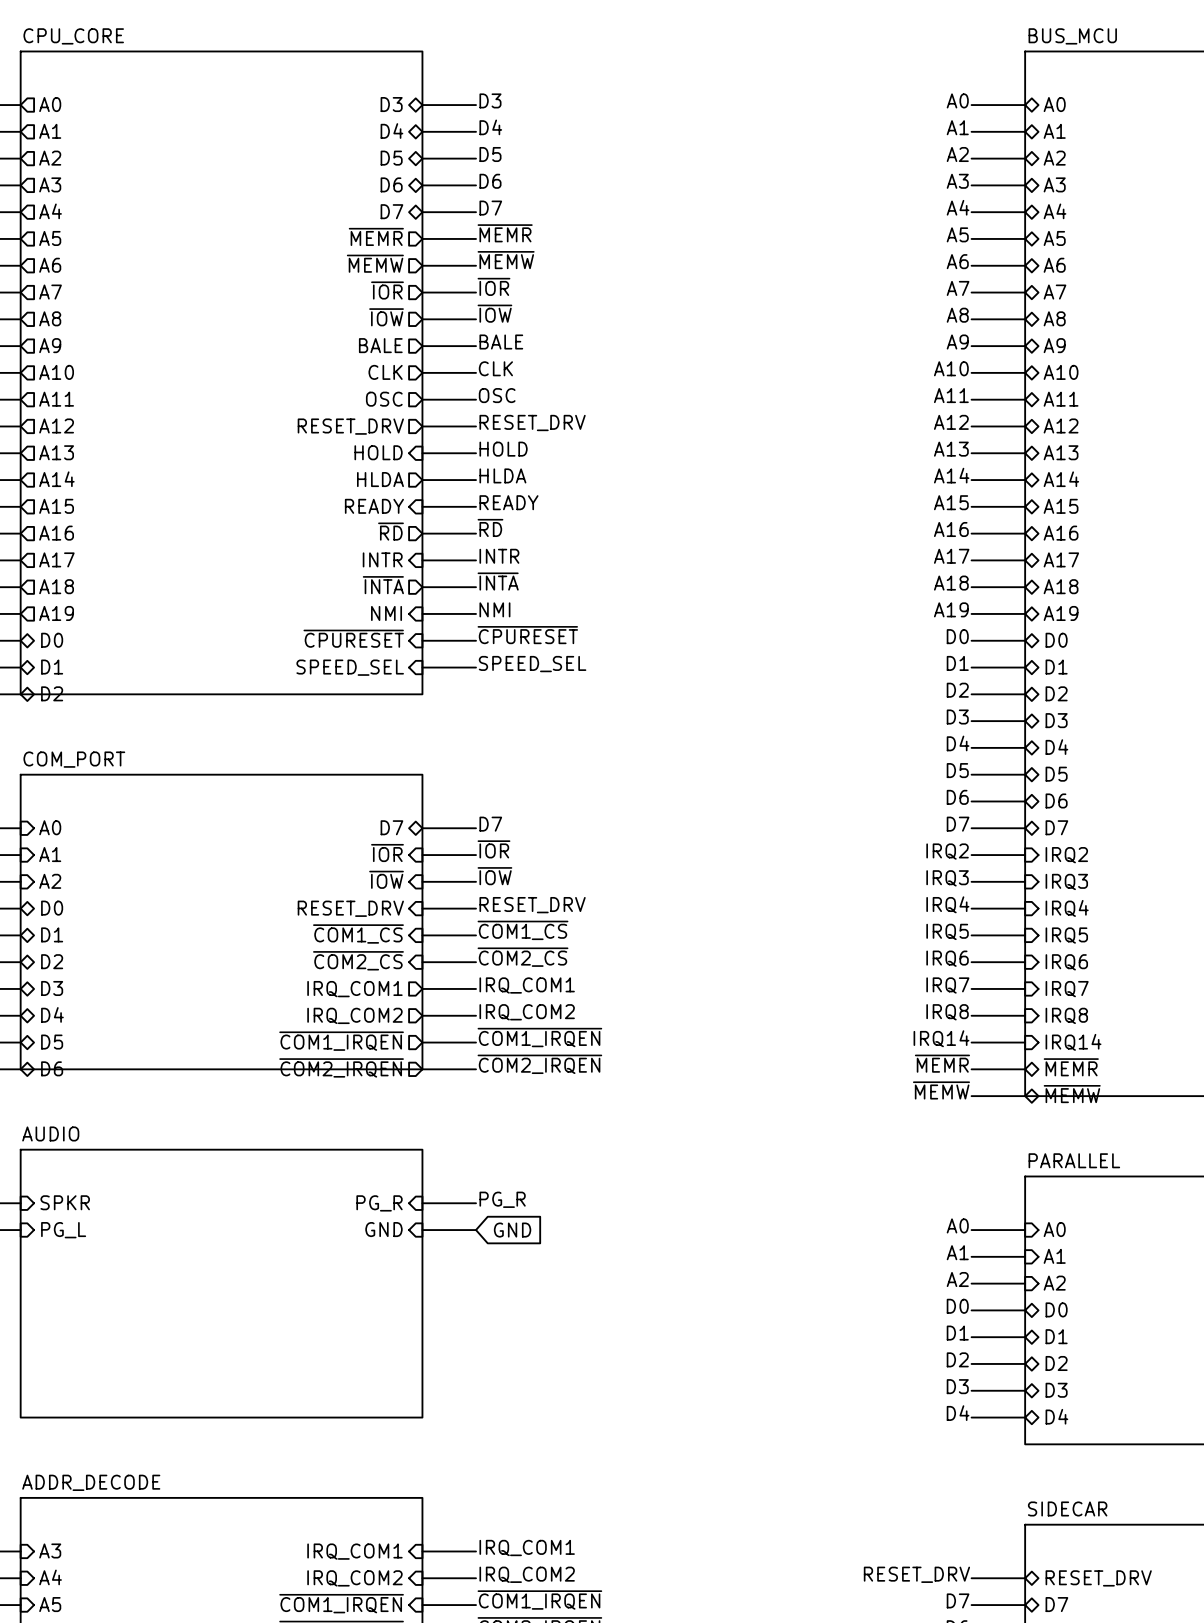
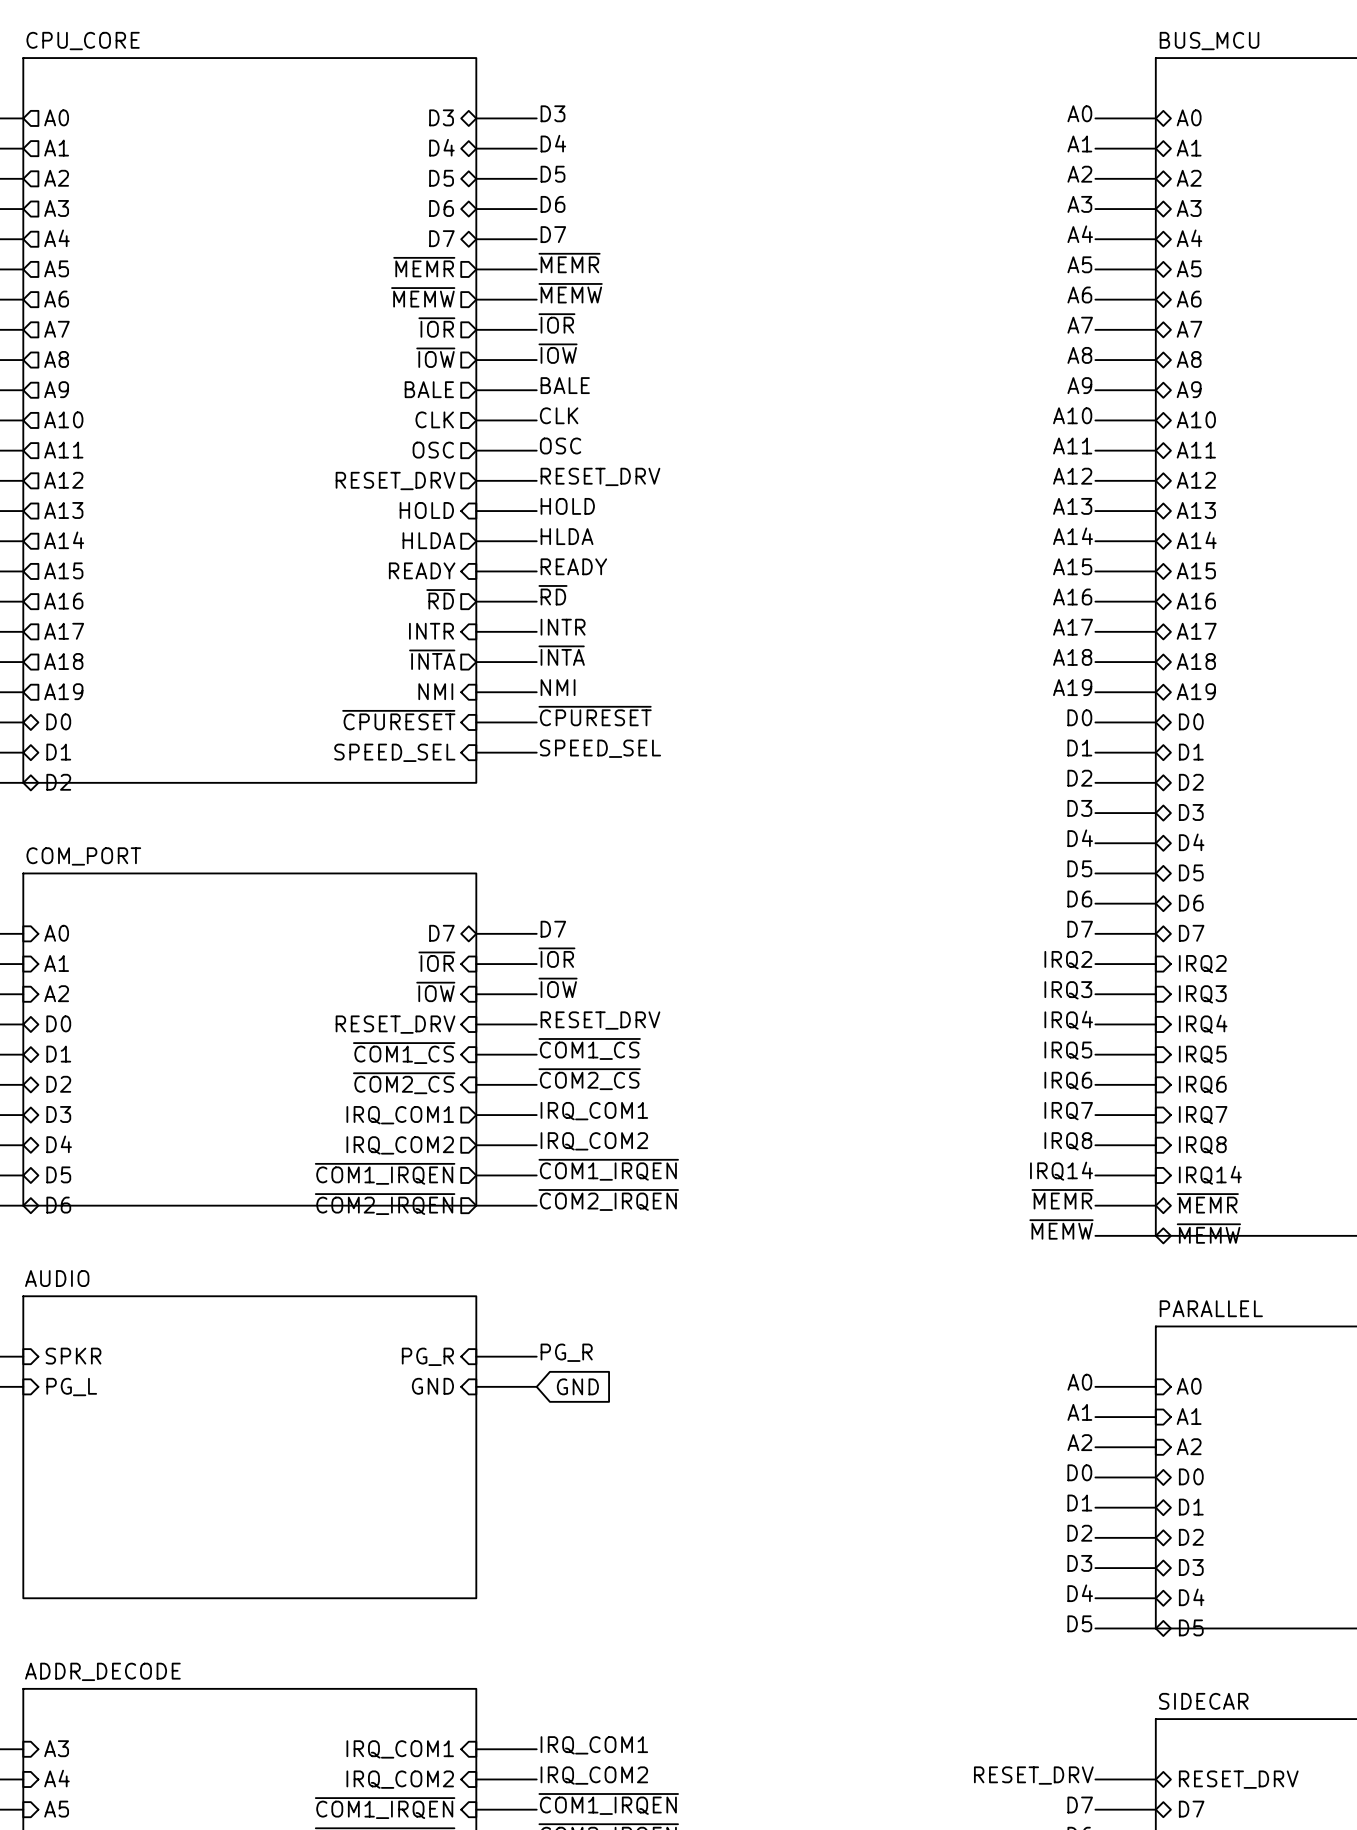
label: none -> D5 (1079, 1623)
sheet pin: none -> D5 (1191, 1627)
wire: none -> (1095, 1628) (1155, 1628)

